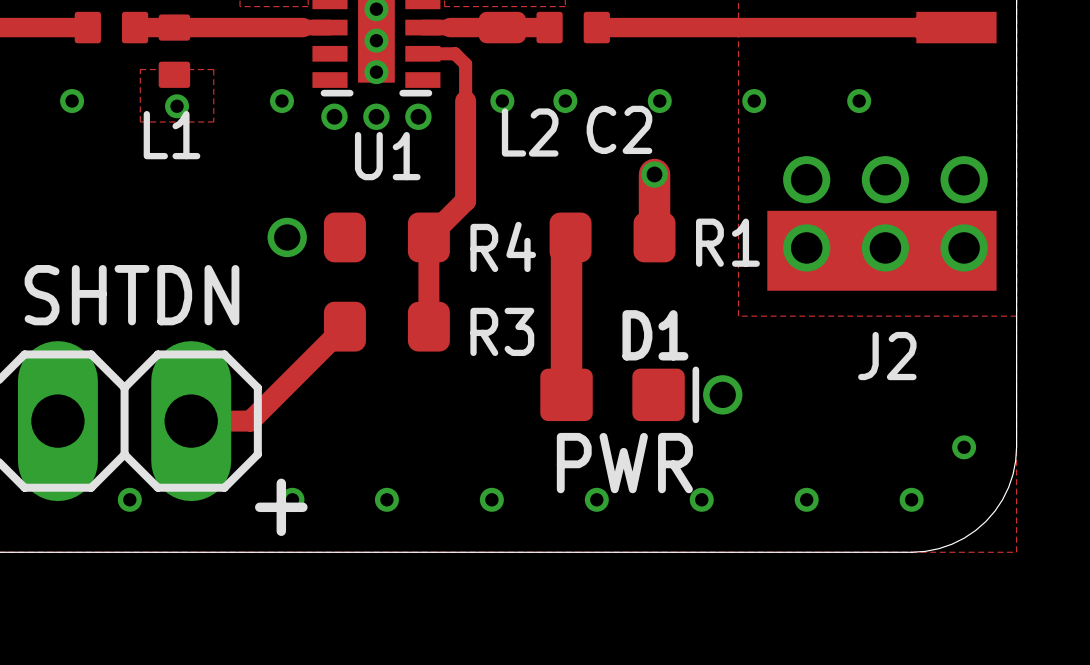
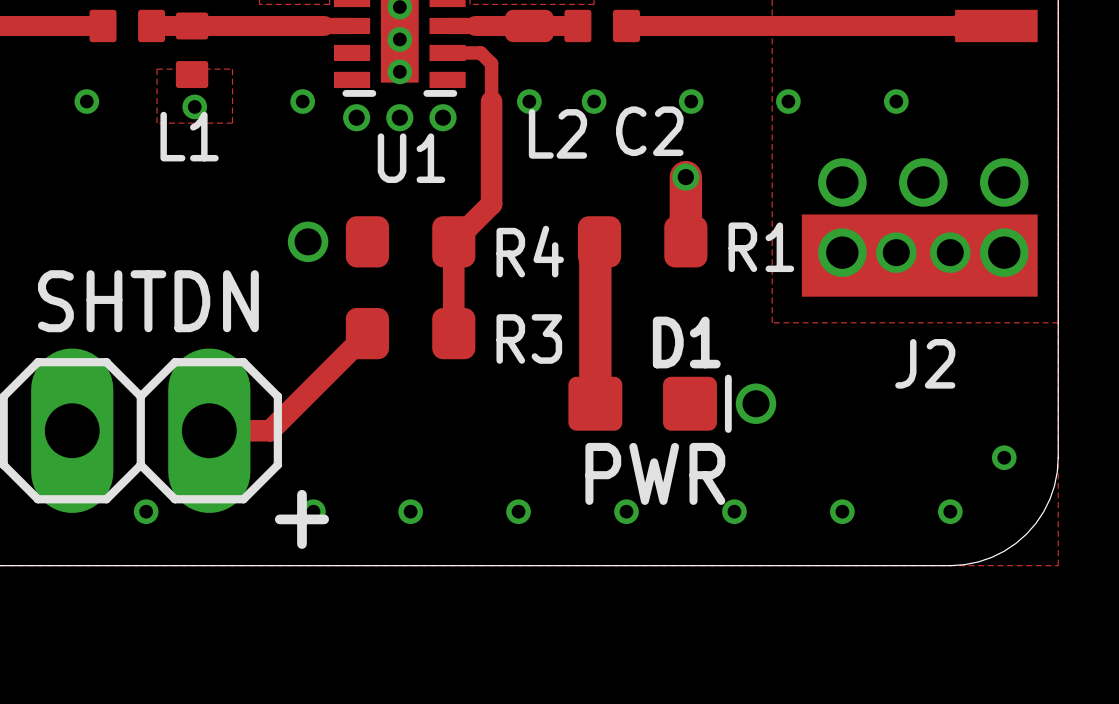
via: none -> (896, 252)
via: (885, 247) -> none
via: none -> (950, 252)

